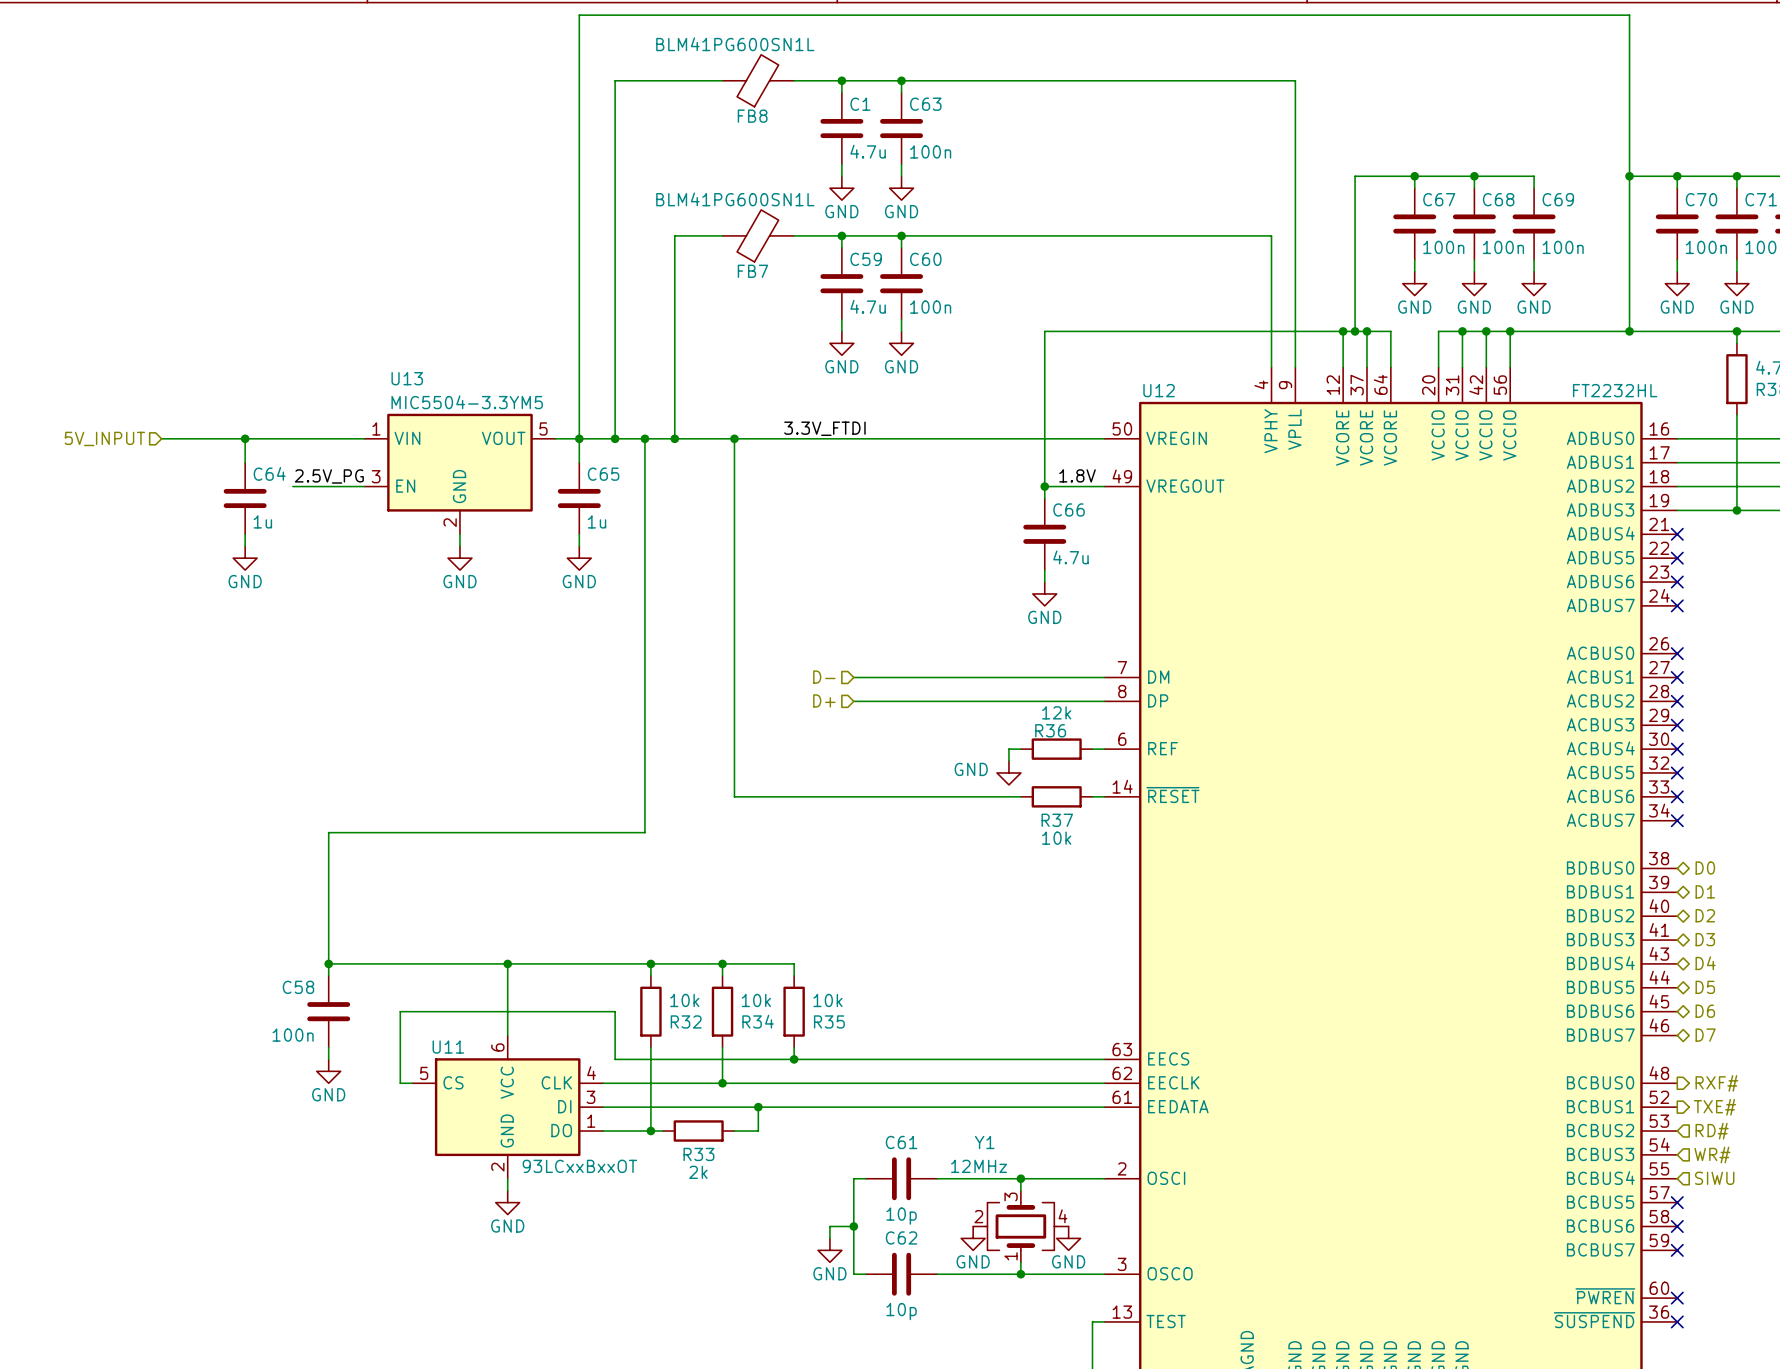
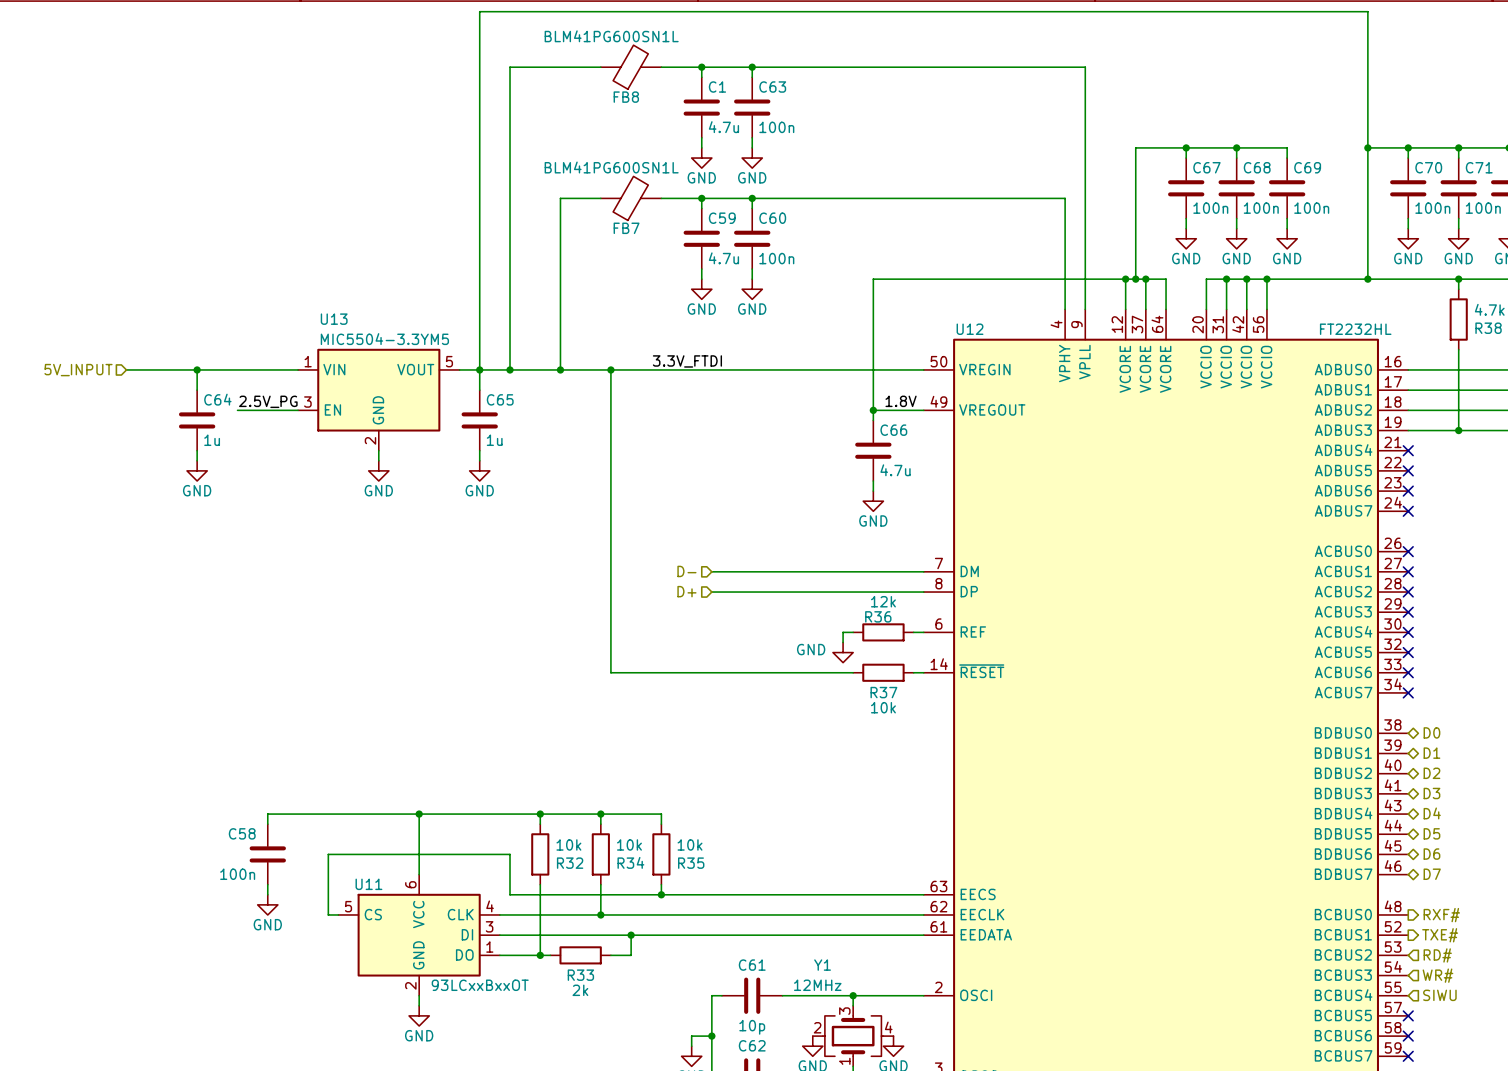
wire: (644, 438) (644, 832) (328, 832) (328, 963) -> none
junction: (644, 438) -> none
junction: (328, 963) -> none

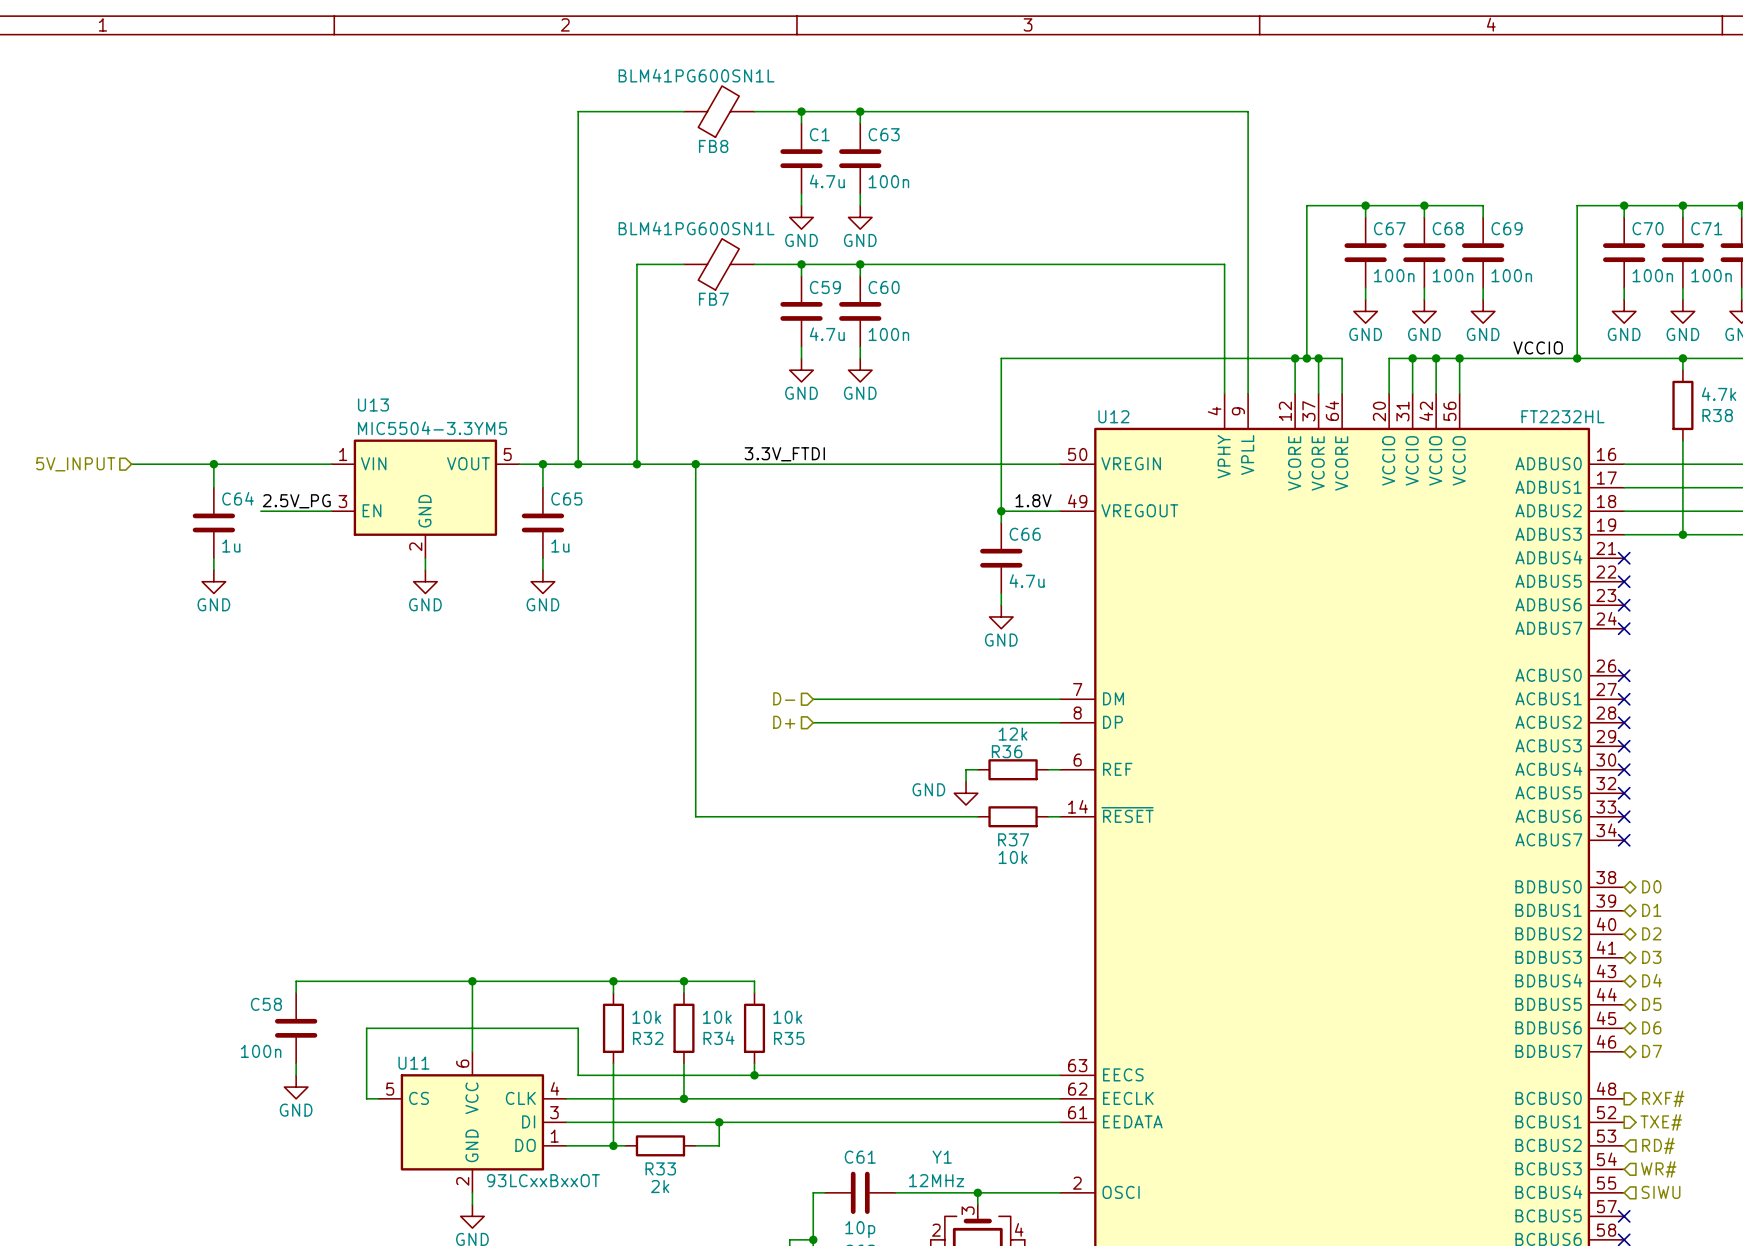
wire: (1367, 147) (1367, 11) (479, 11) (479, 369) -> none
junction: (1367, 147) -> none
label: none -> VCCIO (1538, 347)

